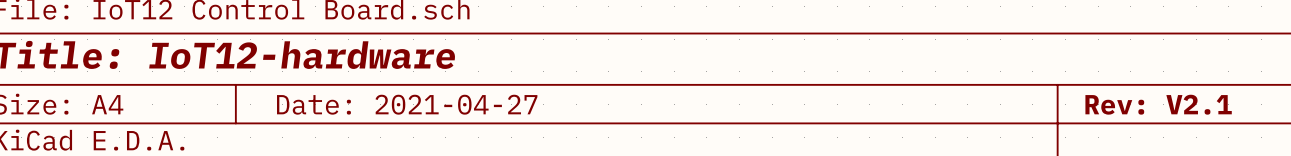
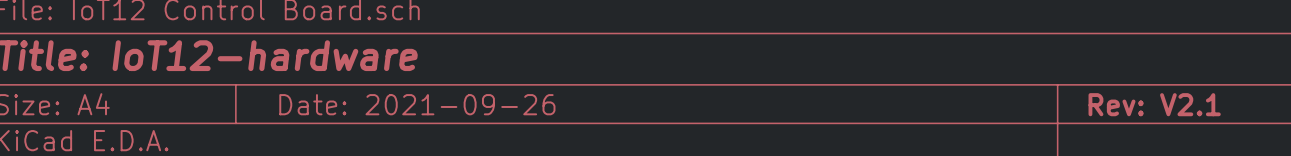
title block: Date: 2021-04-27 (407, 104) -> Date: 2021-09-26 (417, 104)

